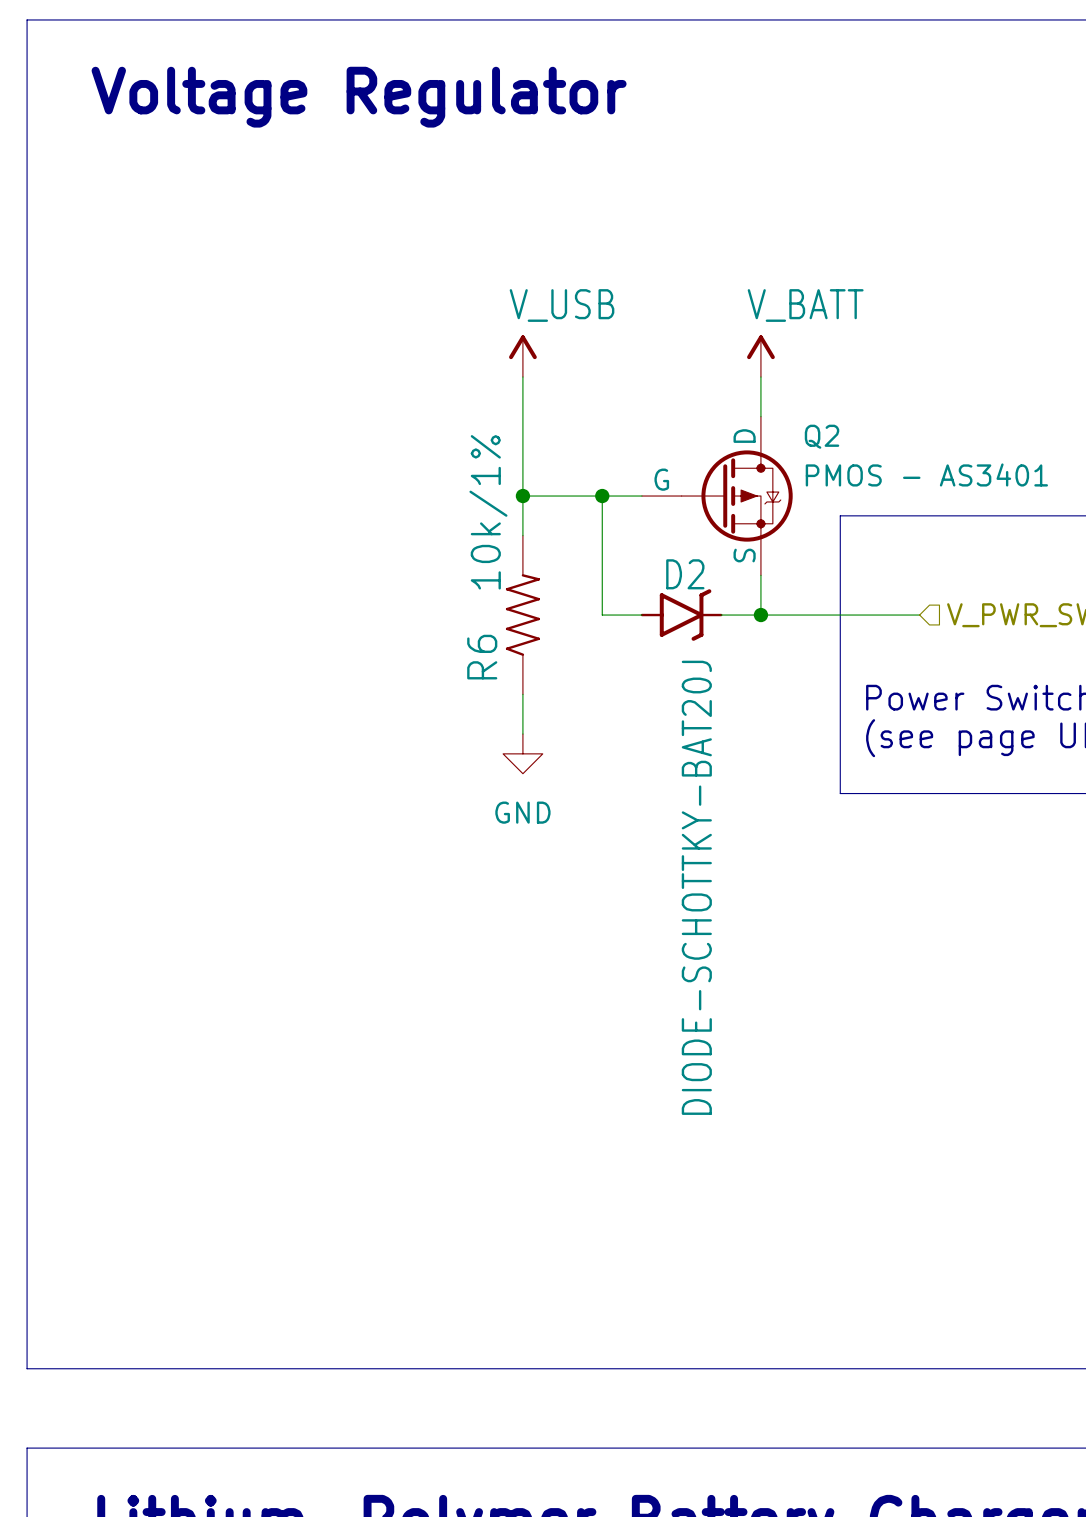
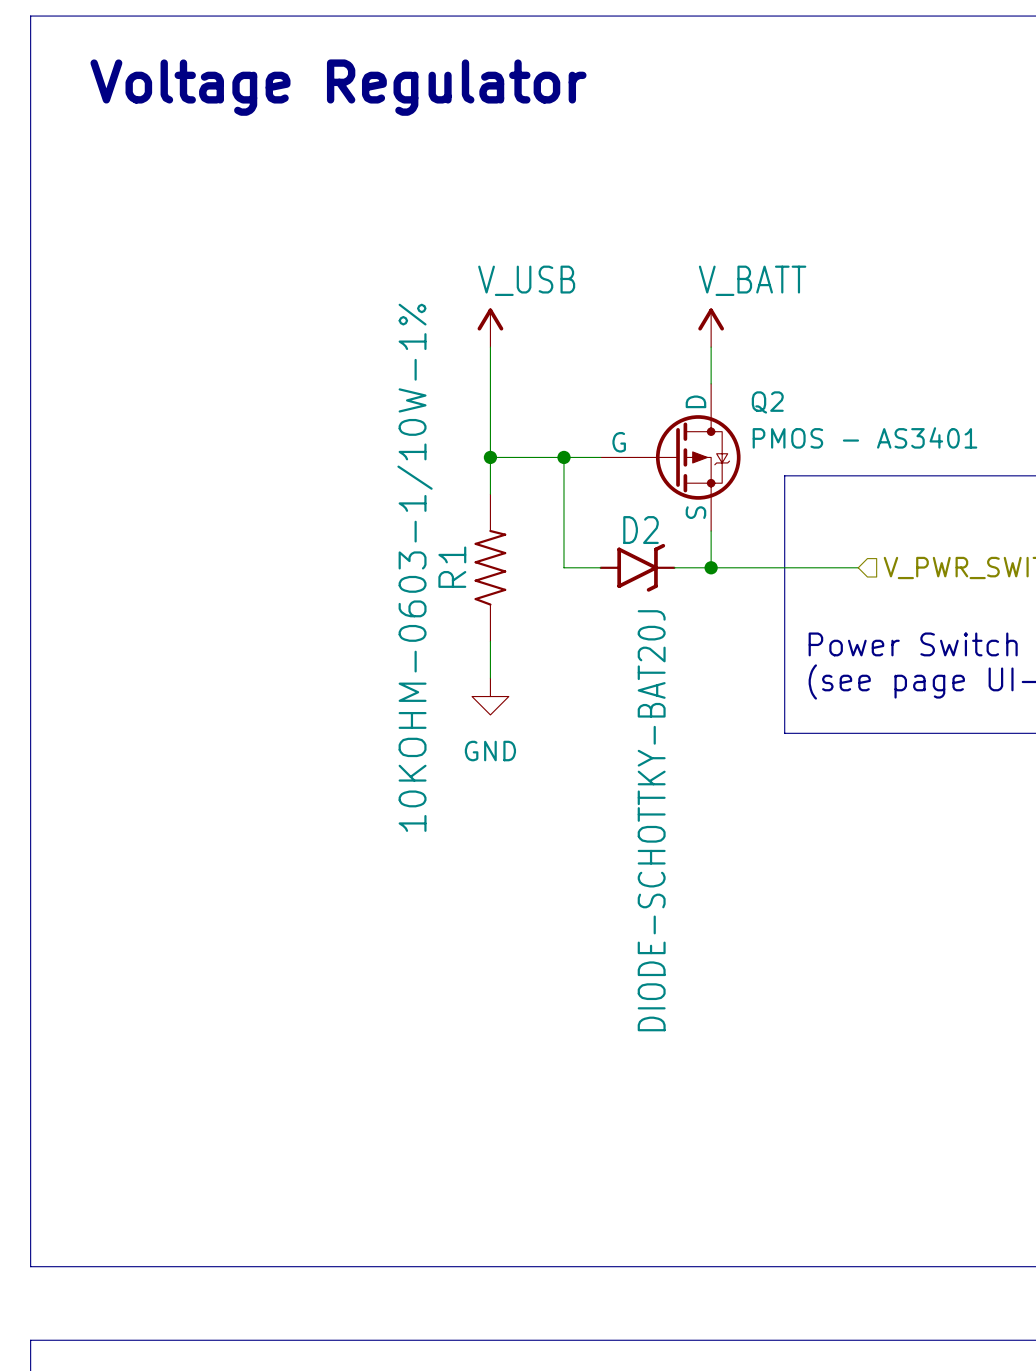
R6 value: 10k/1% (488, 512) -> 10KOHM-0603-1/10W-1% (415, 567)
R6 name: R6 (482, 657) -> R1 (452, 567)

